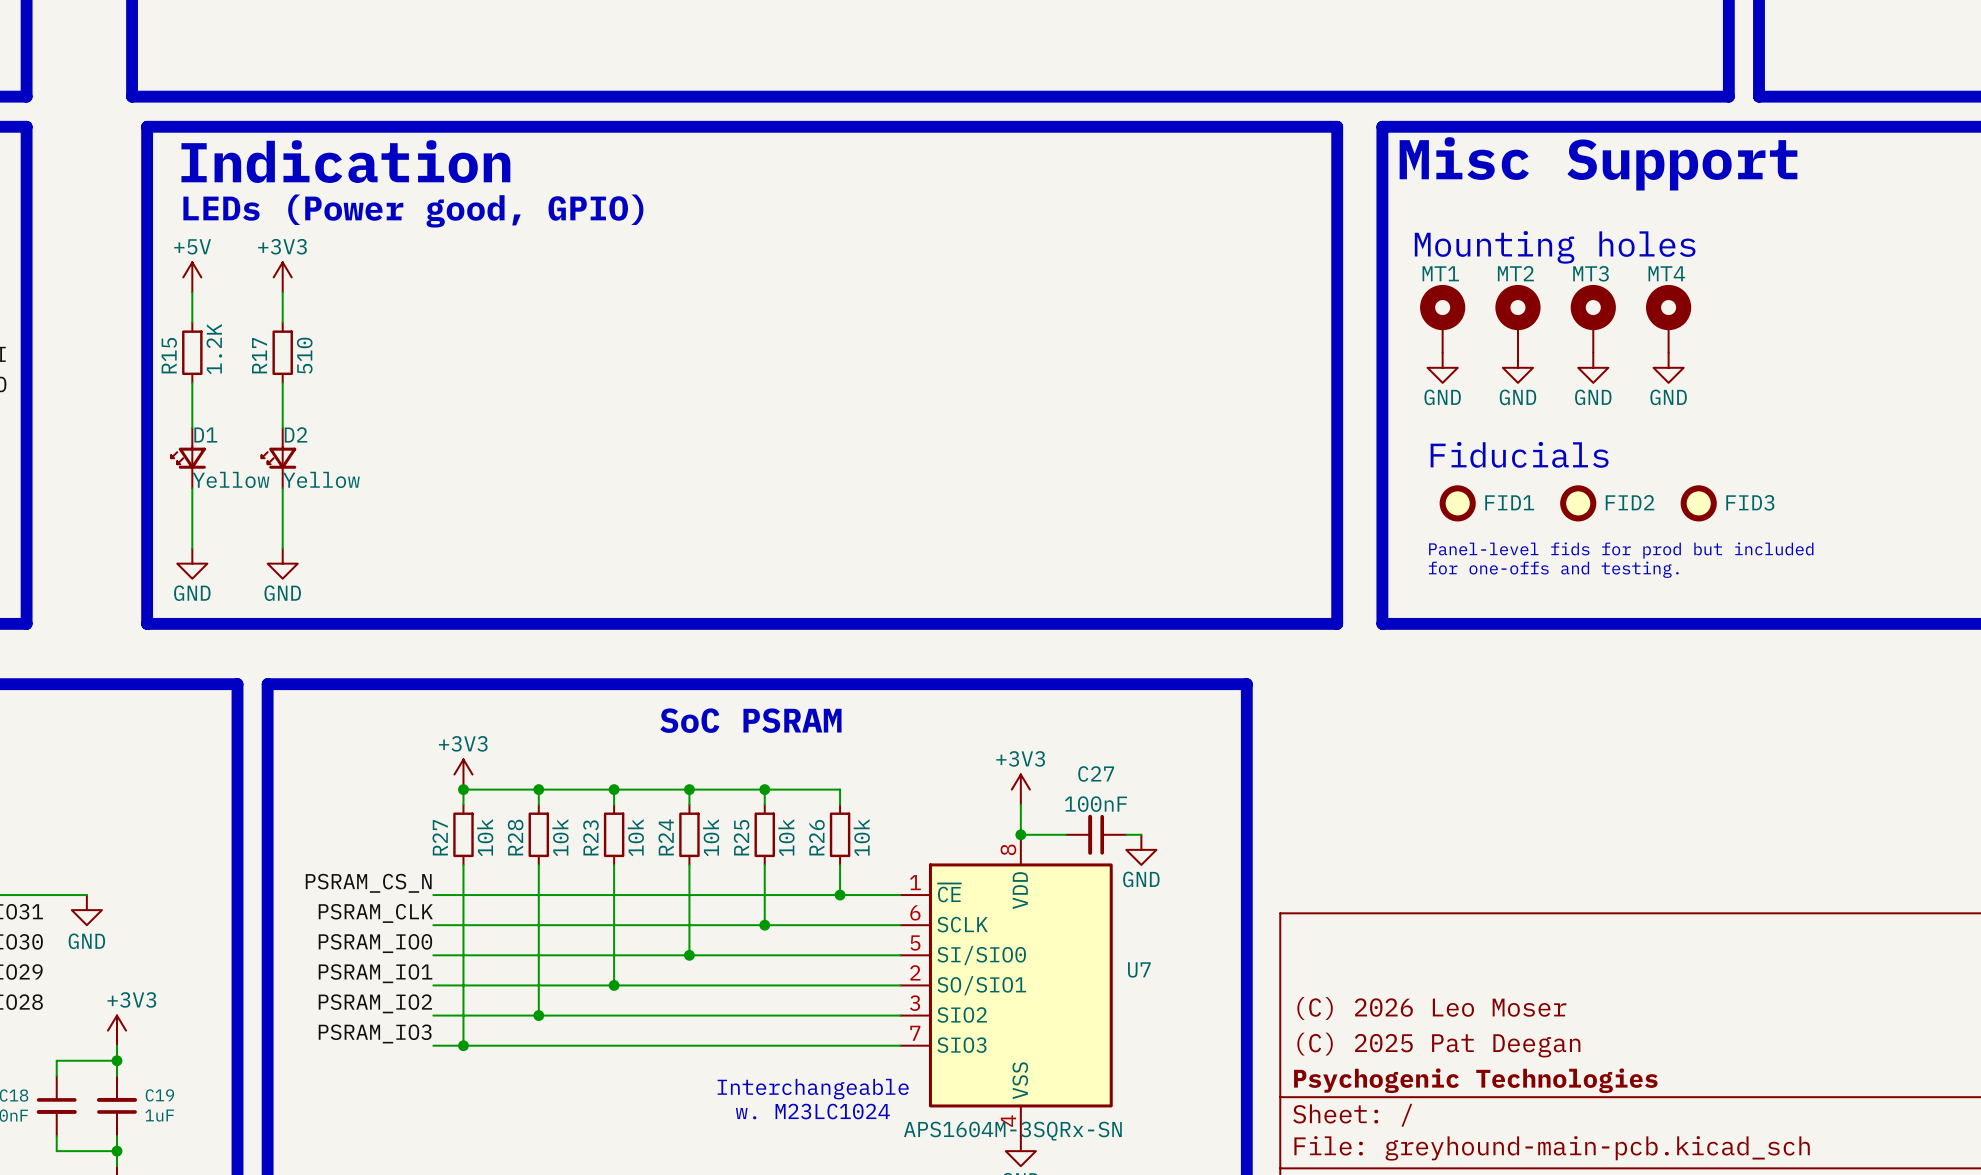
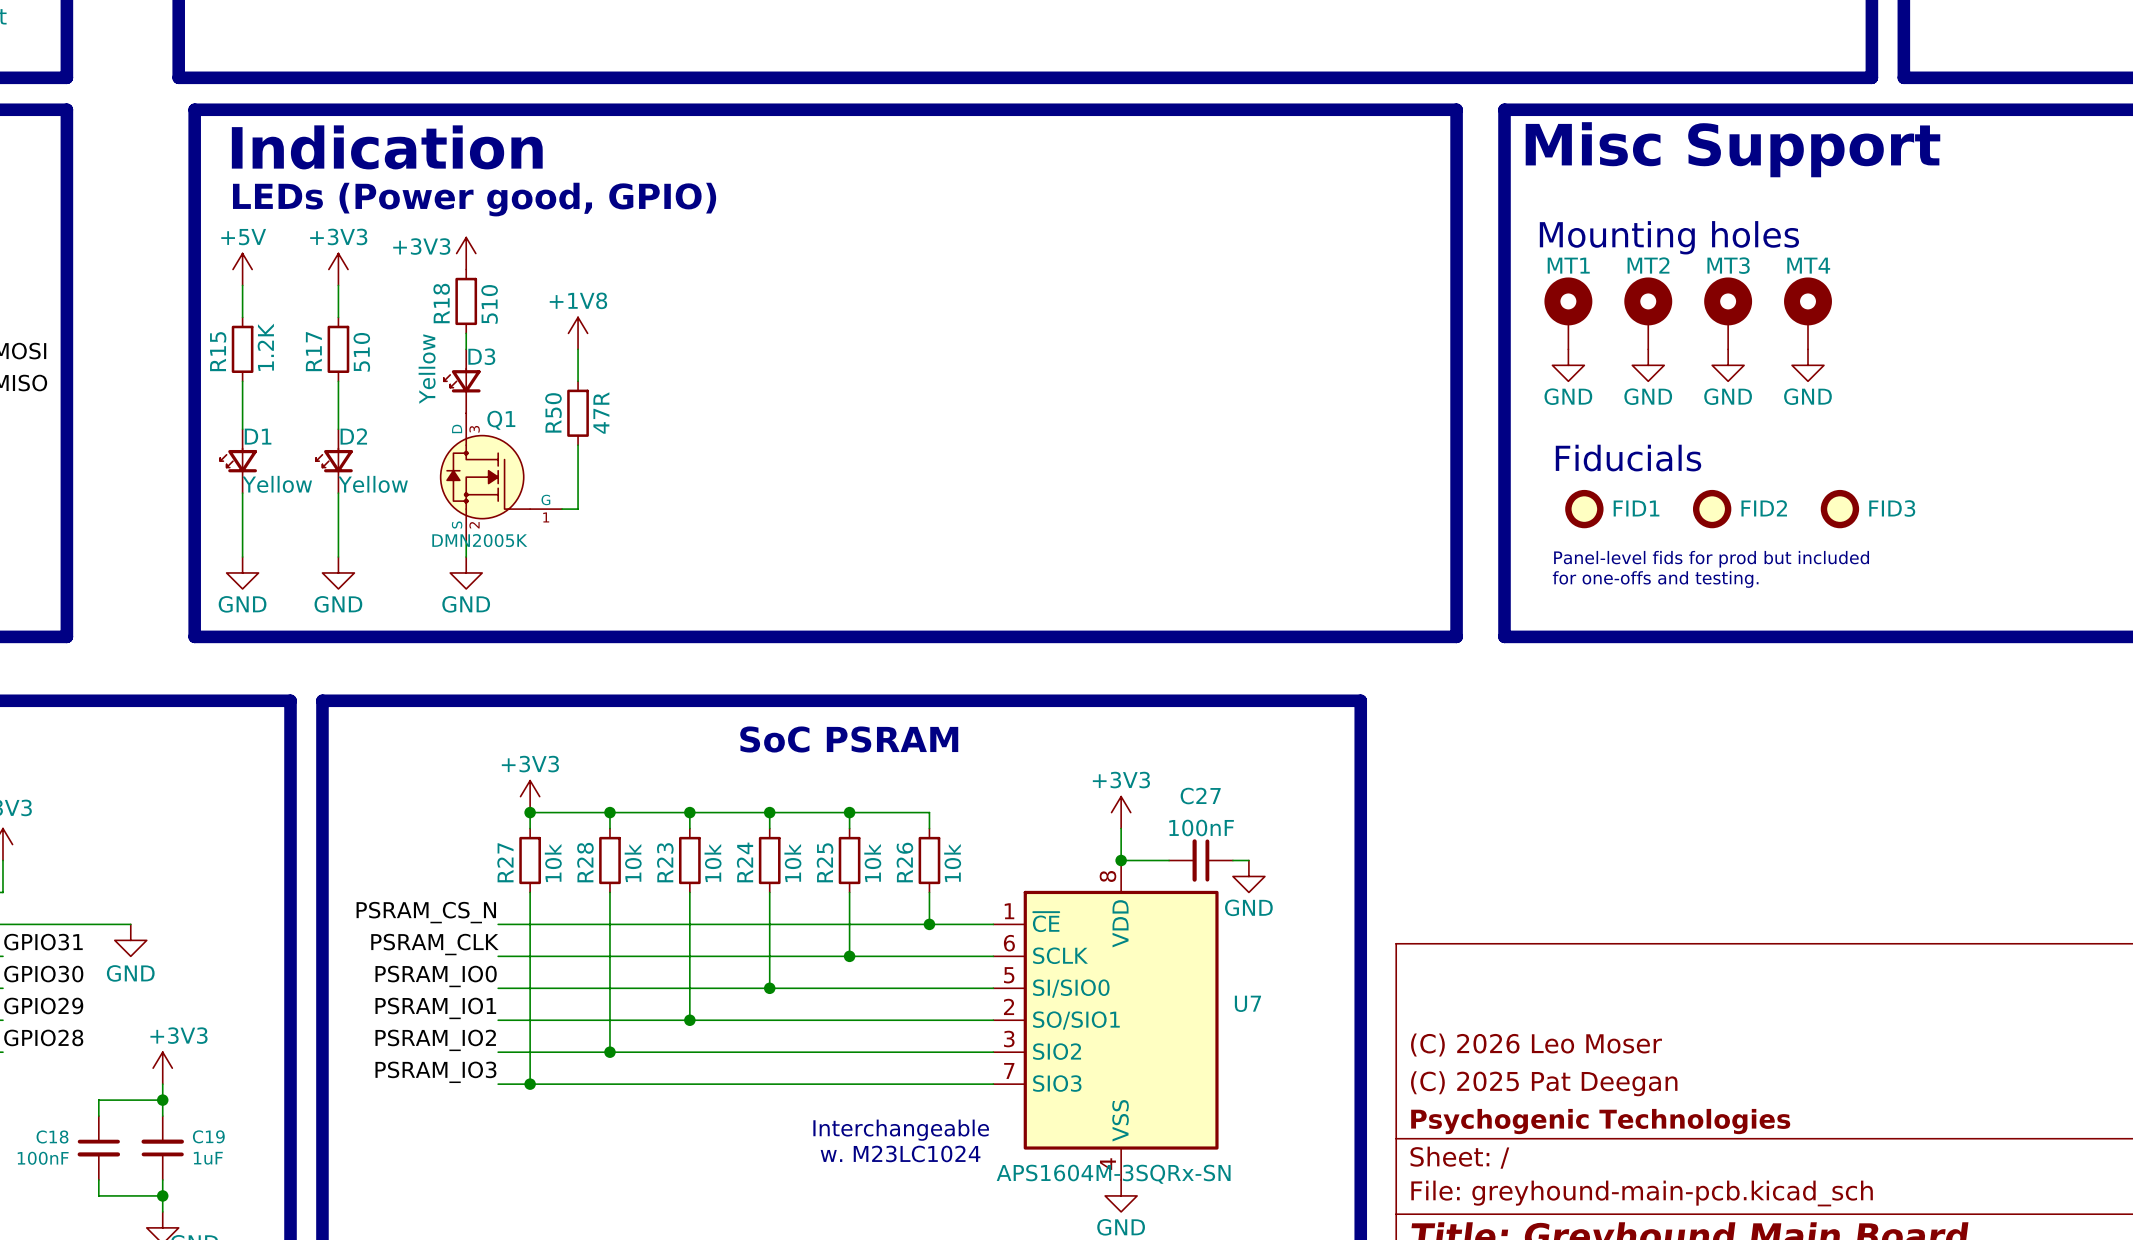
power symbol: none -> +3V3 (466, 253)
R18: none -> 510 (466, 301)
wire: none -> (466, 333) (466, 349)
power symbol: none -> +1V8 (578, 333)
wire: none -> (578, 349) (578, 381)
D3: none -> Yellow (462, 381)
R50: none -> 47R (578, 413)
wire: none -> (578, 445) (578, 509) (562, 509)
Q1: none -> DMN2005K (501, 477)
wire: none -> (466, 541) (466, 557)
power symbol: none -> GND (466, 572)

